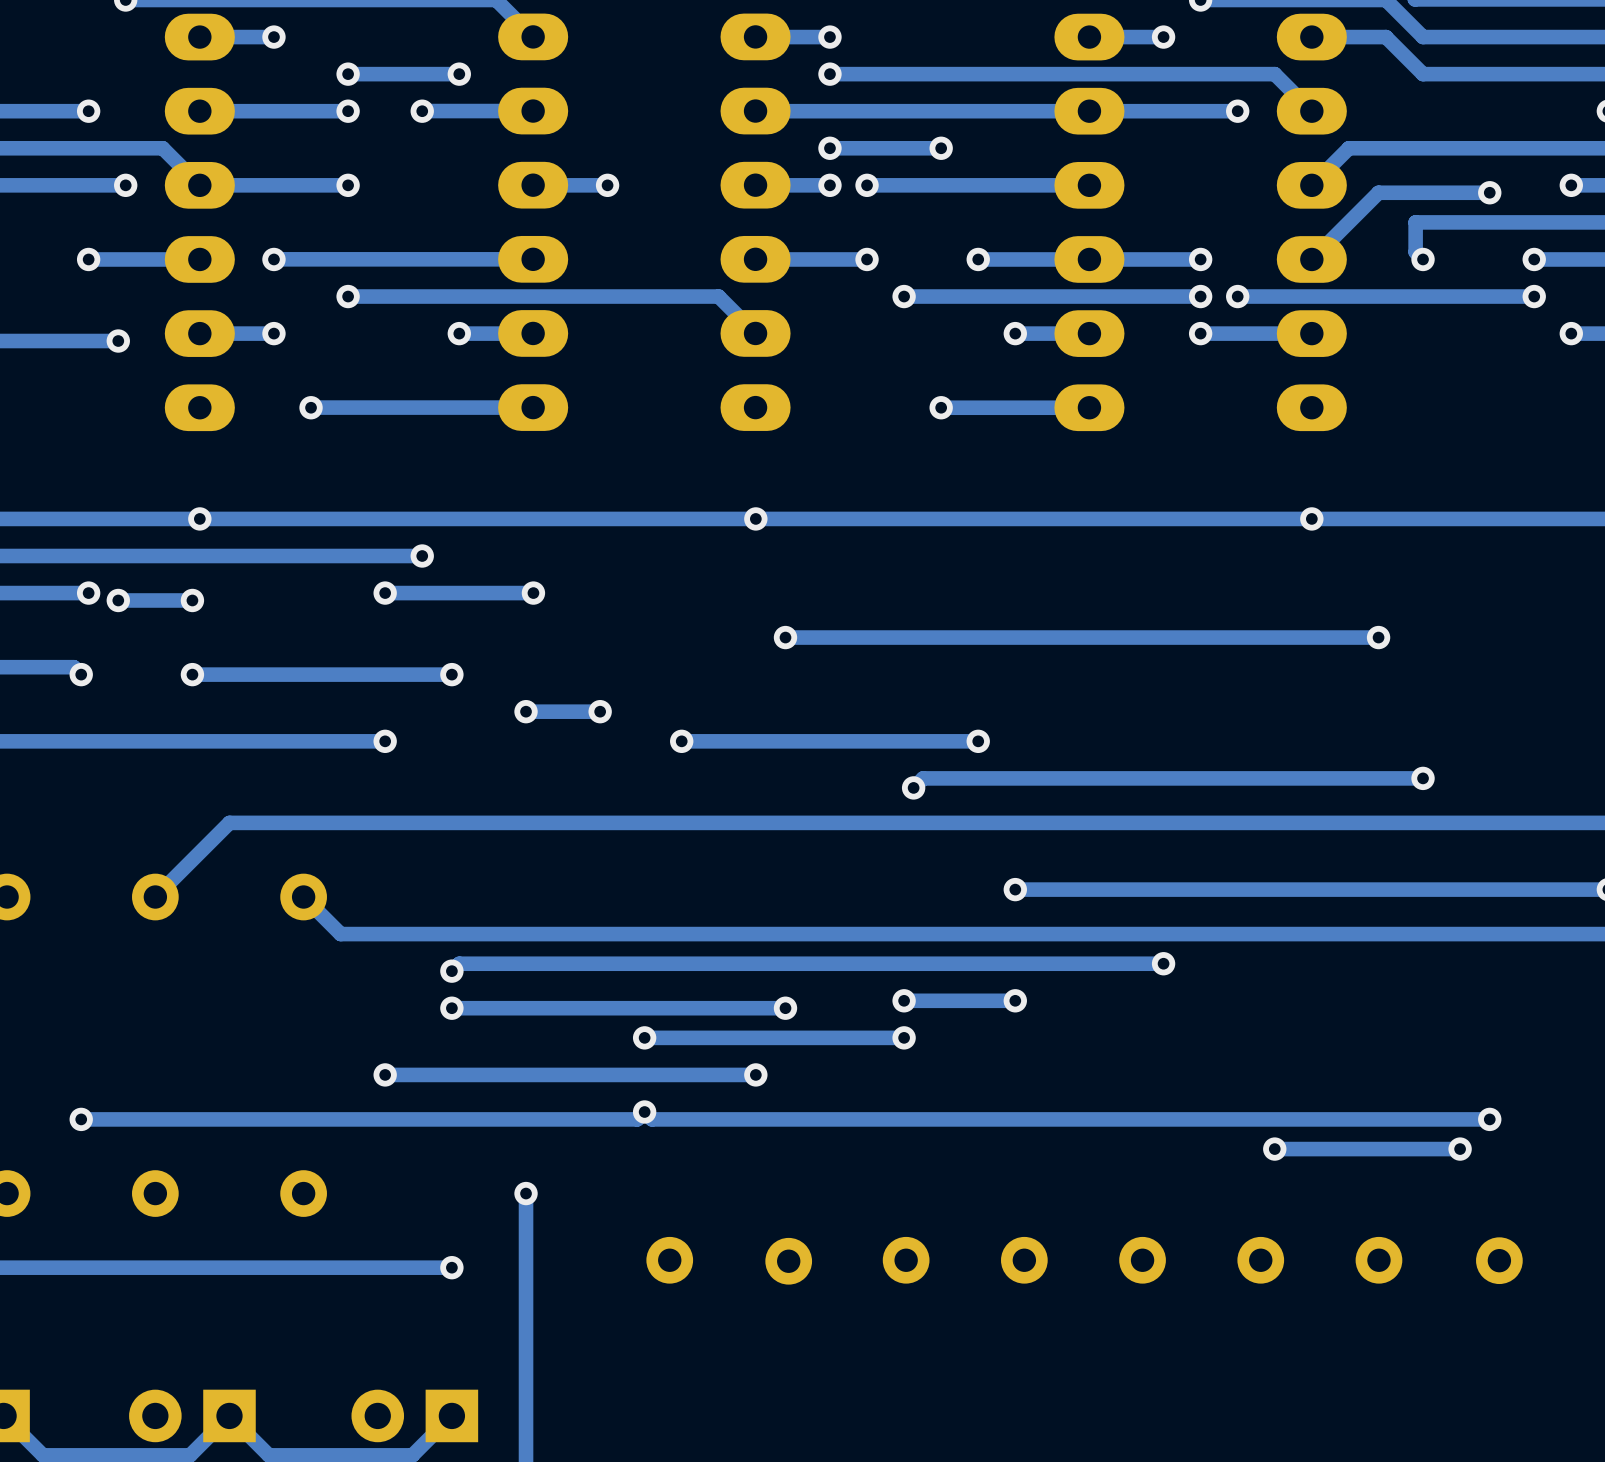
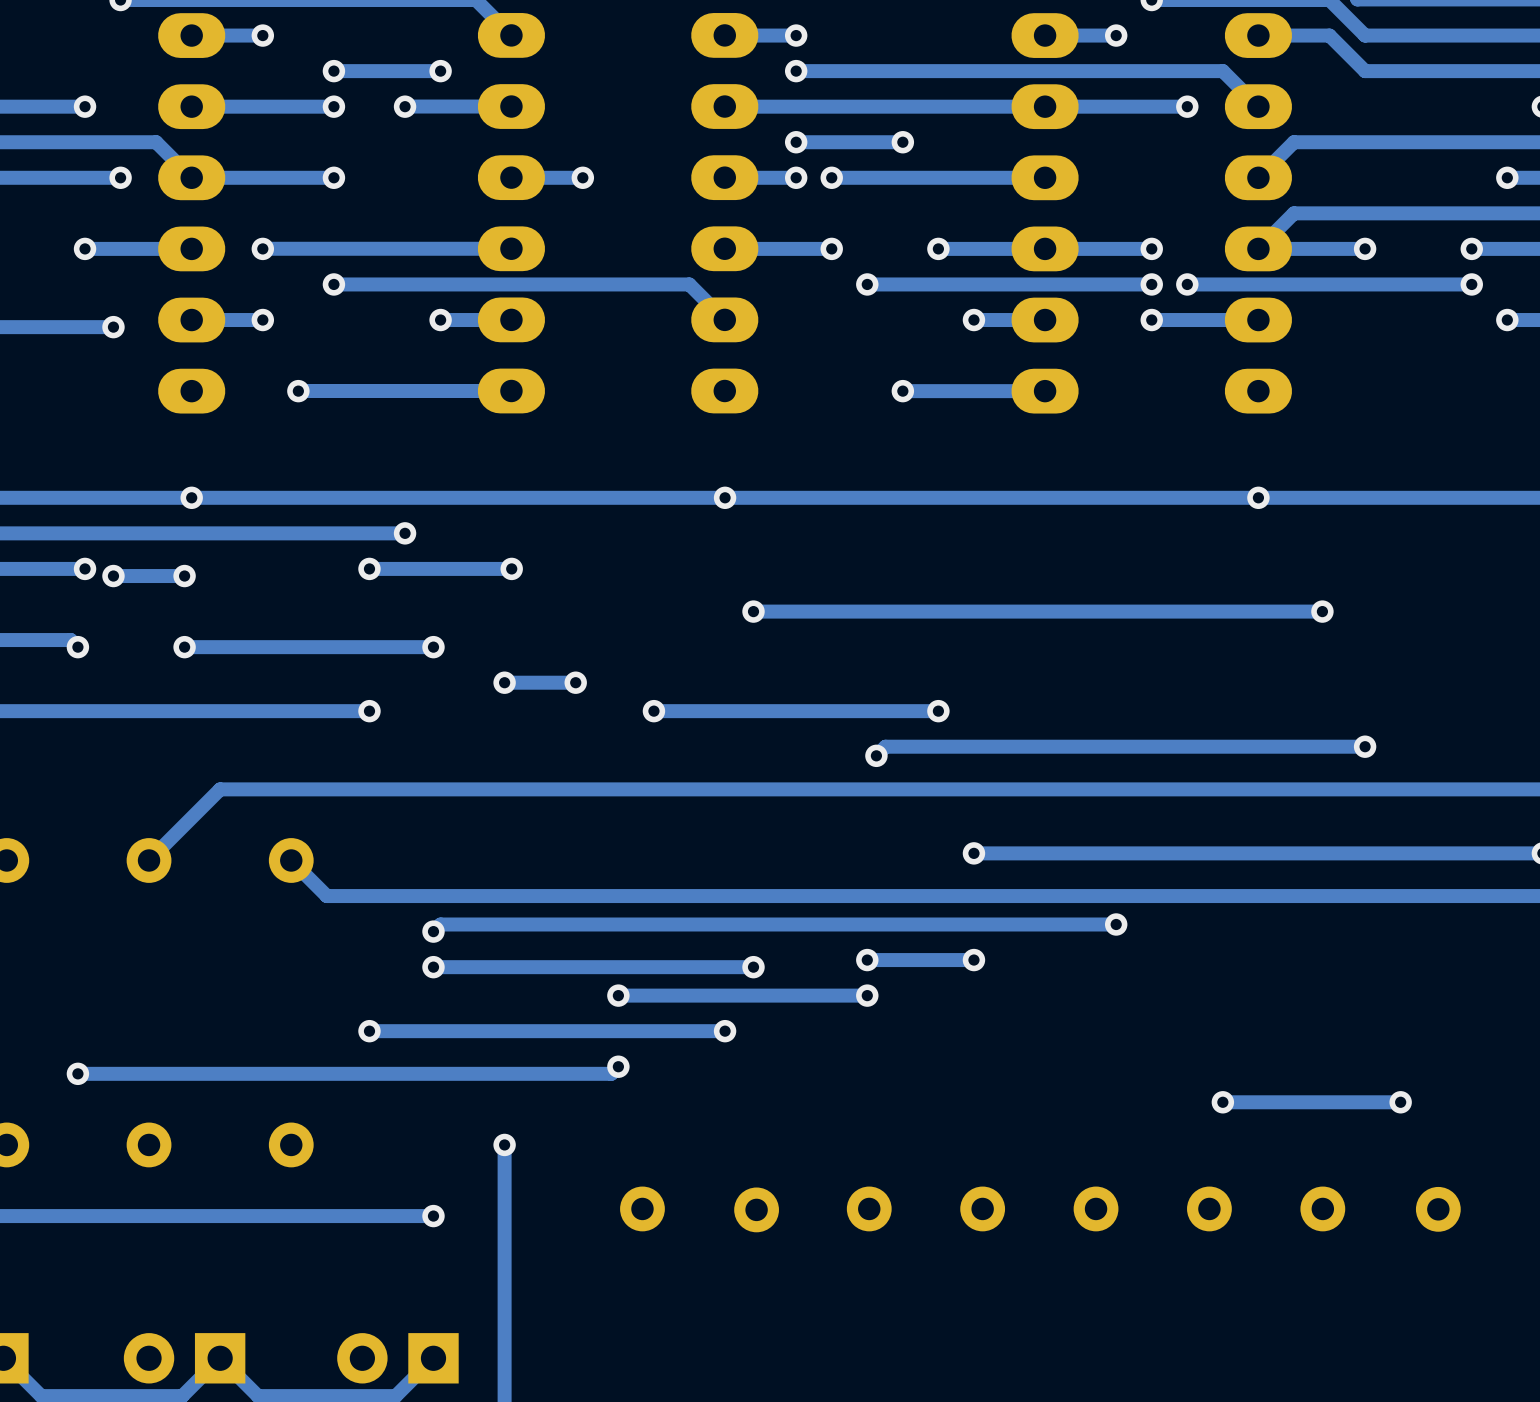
track: (1489, 192) (1378, 192) (1348, 222) -> (1357, 213) (1293, 213)
via: (1489, 192) -> none
track: (1415, 222) (1415, 252) (1423, 259) -> (1258, 248) (1365, 248)
track: (644, 1112) (652, 1119) (1489, 1119) -> none
via: (1489, 1119) -> none

